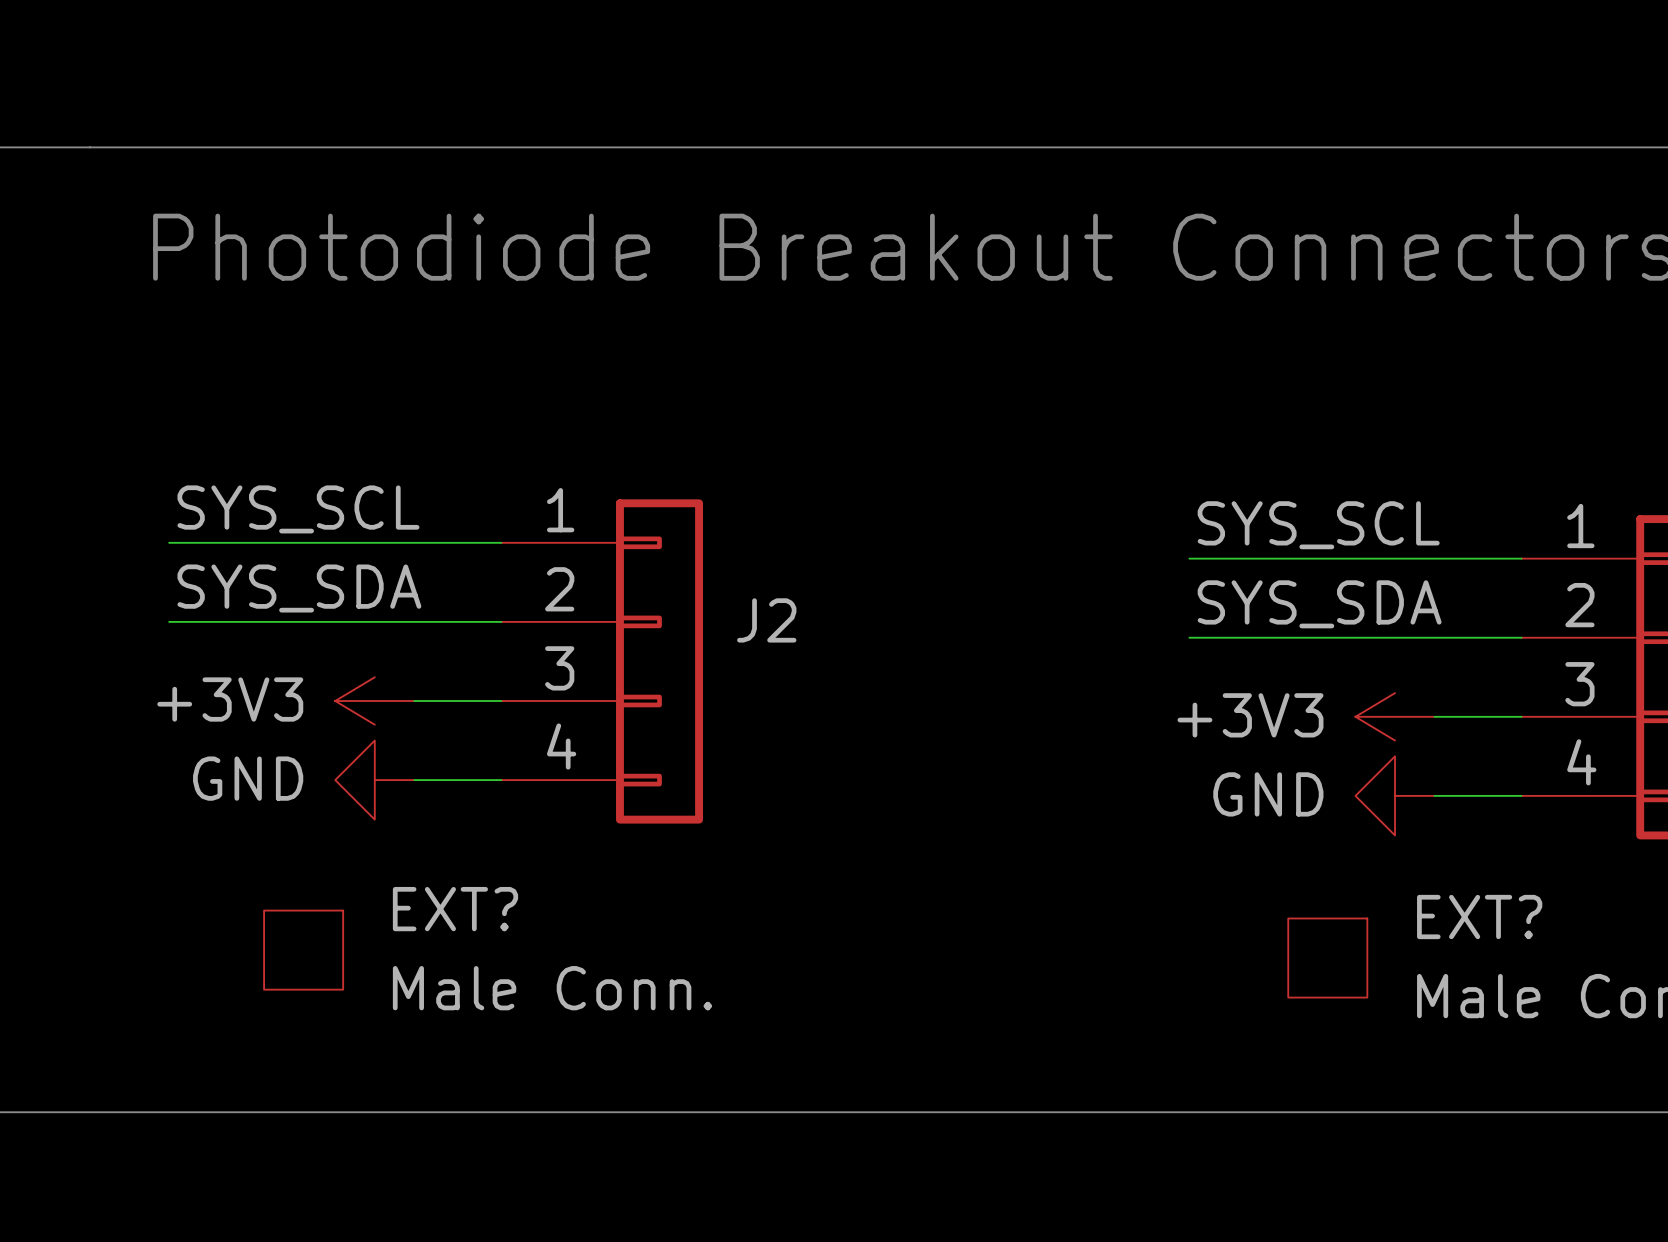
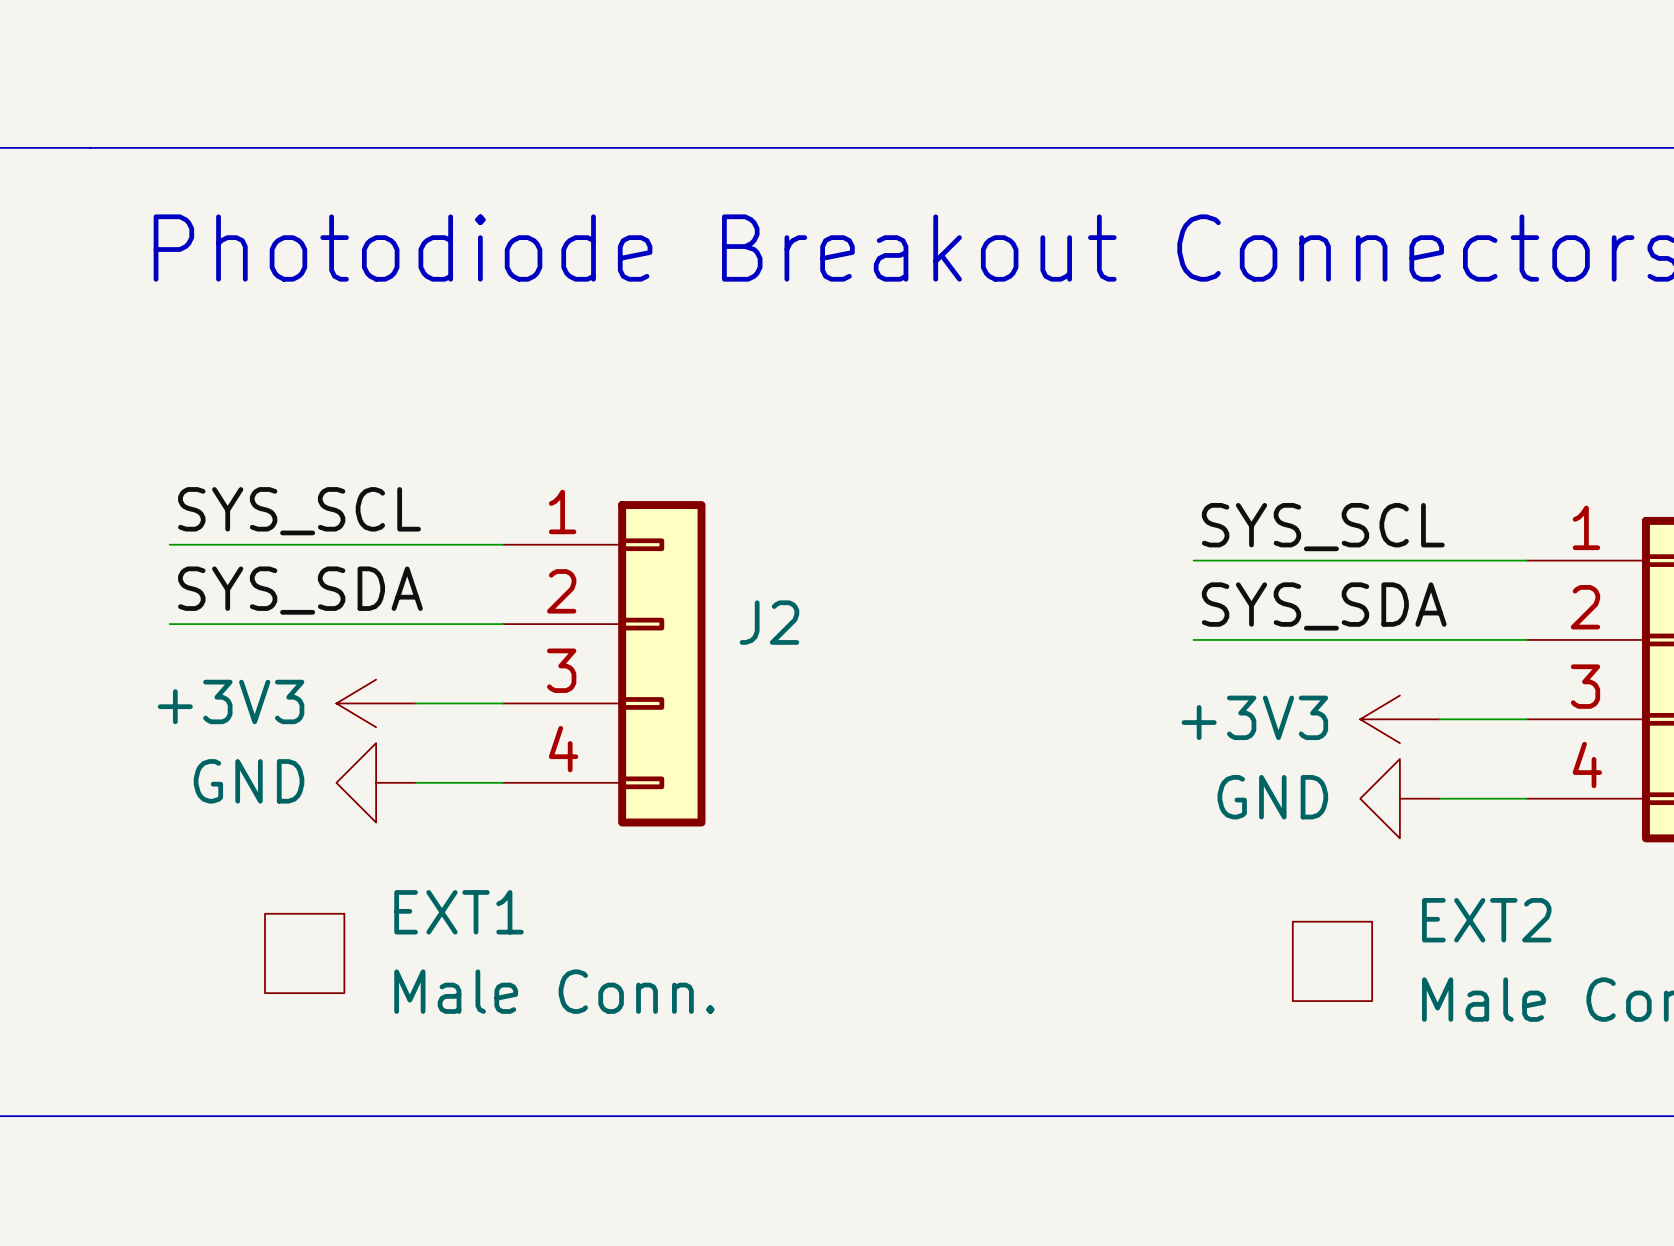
EXT? name: EXT? (455, 909) -> EXT1 (458, 912)
EXT? name: EXT? (1479, 917) -> EXT2 (1486, 920)

